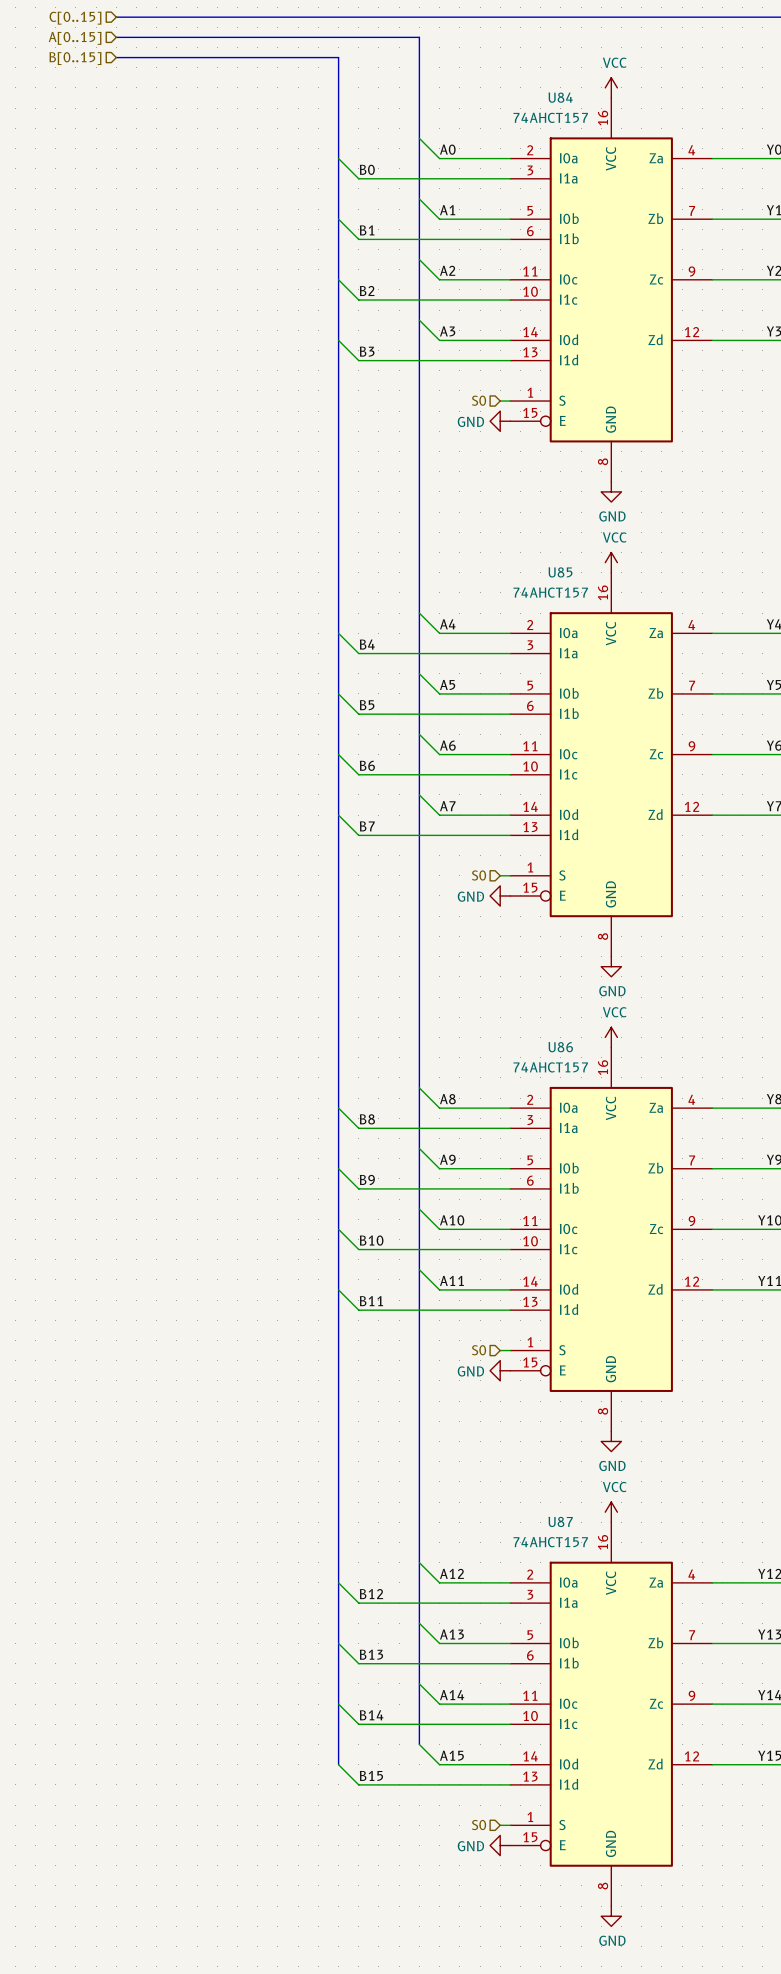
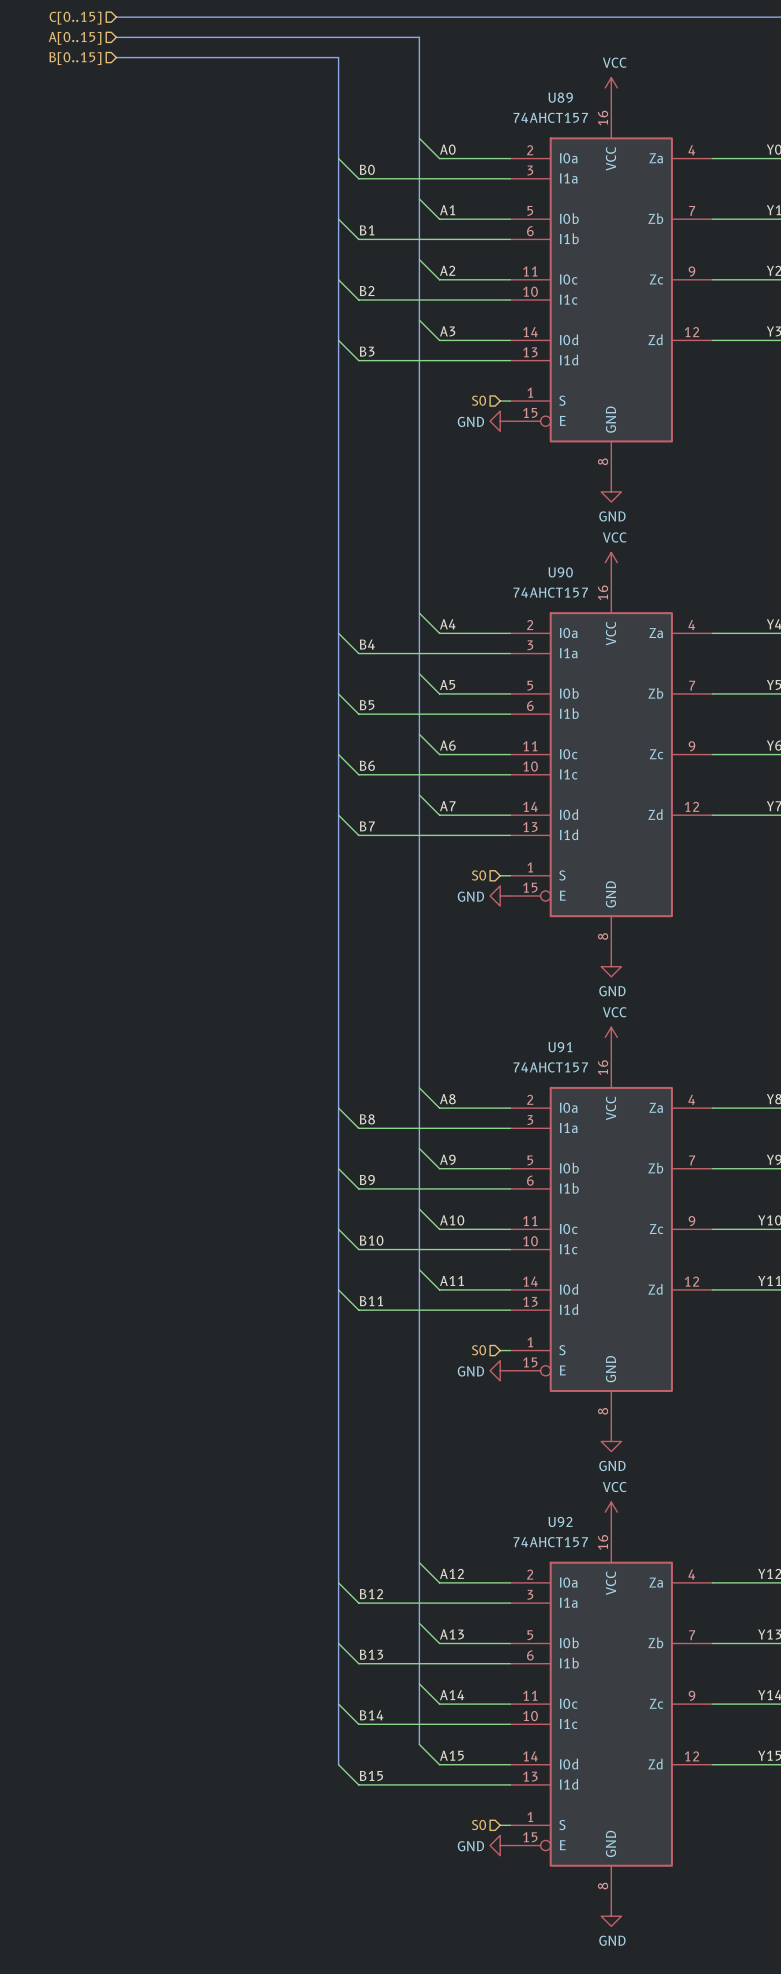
U84 name: U84 (560, 97) -> U89 (560, 97)
U85 name: U85 (560, 572) -> U90 (560, 572)
U86 name: U86 (560, 1047) -> U91 (560, 1047)
U87 name: U87 (560, 1521) -> U92 (560, 1521)

